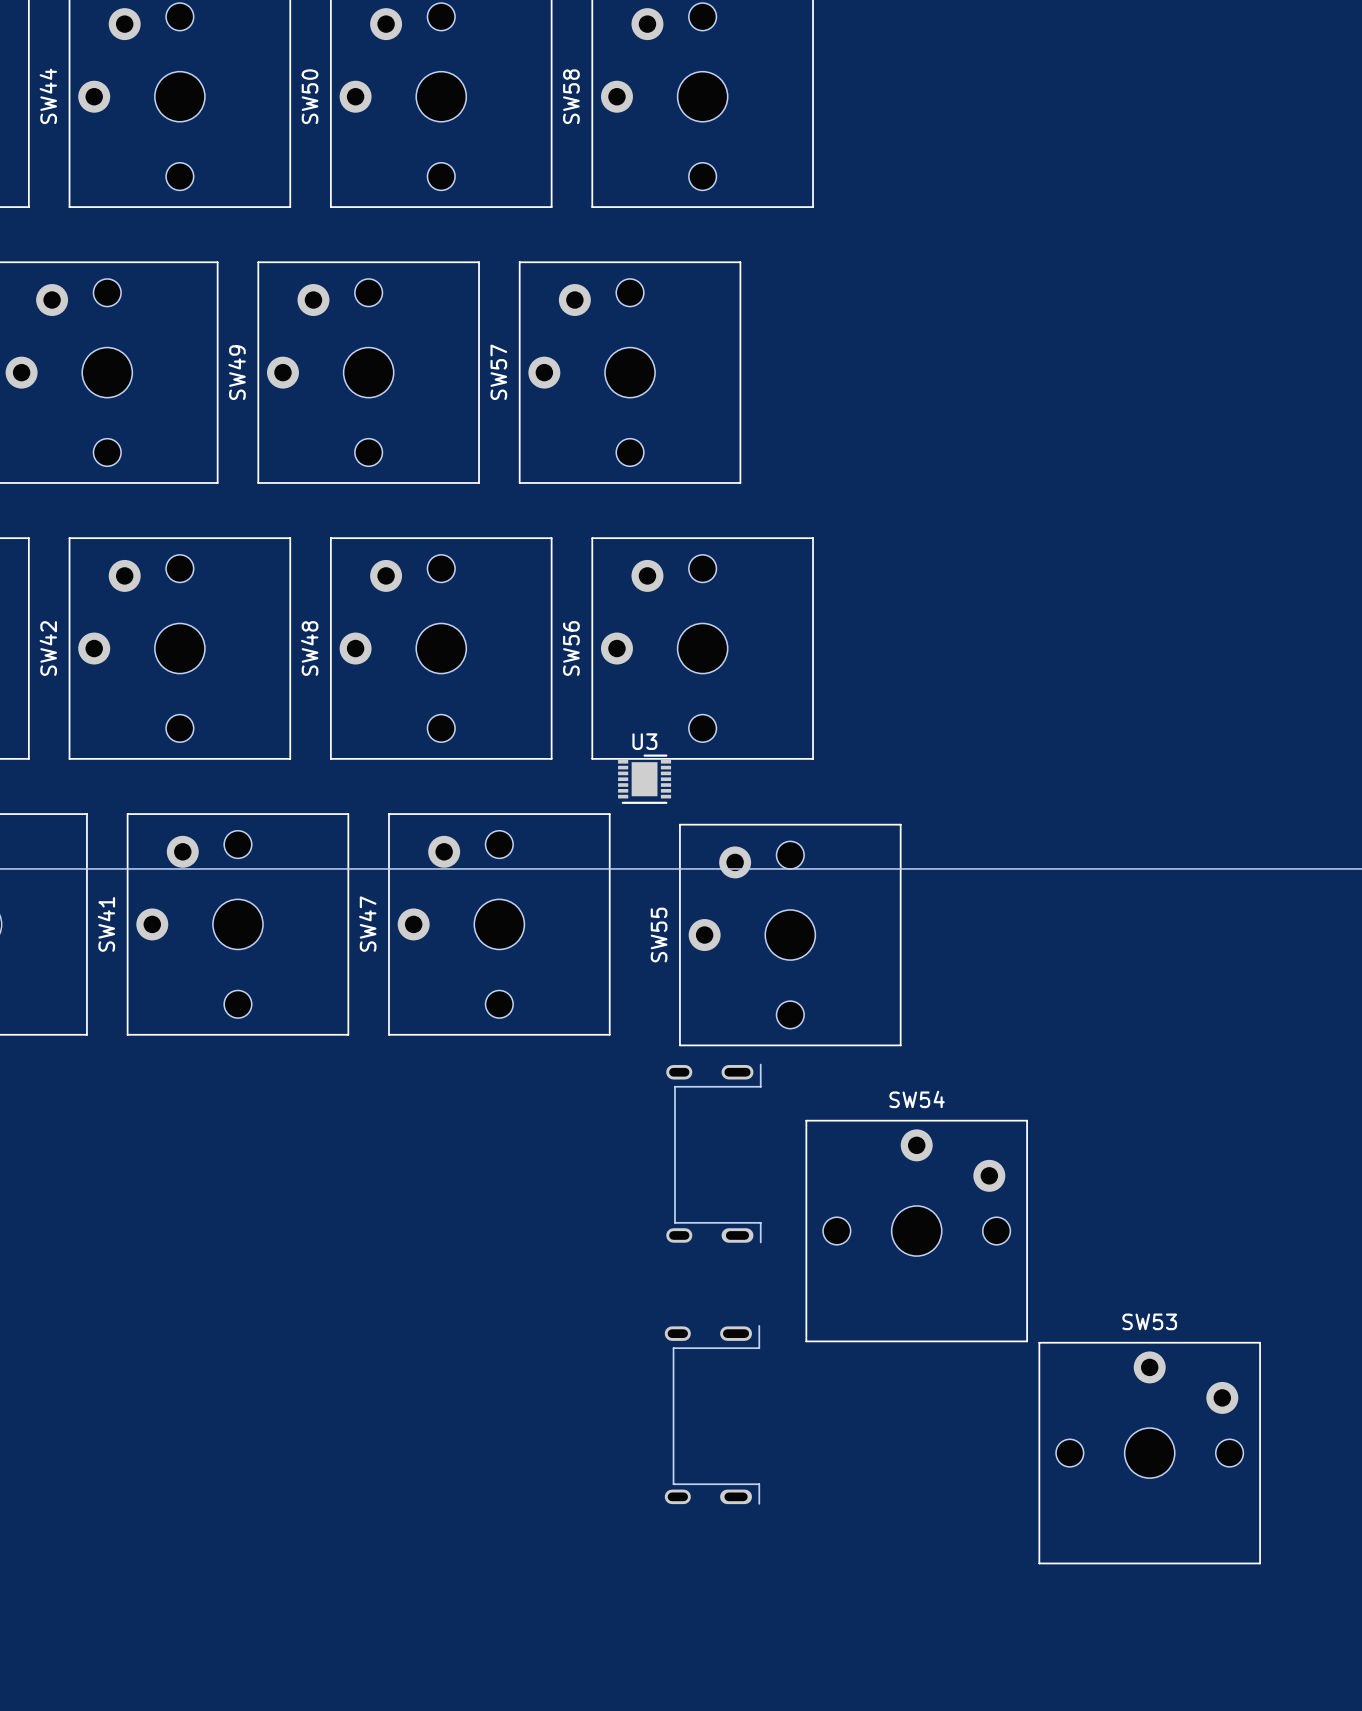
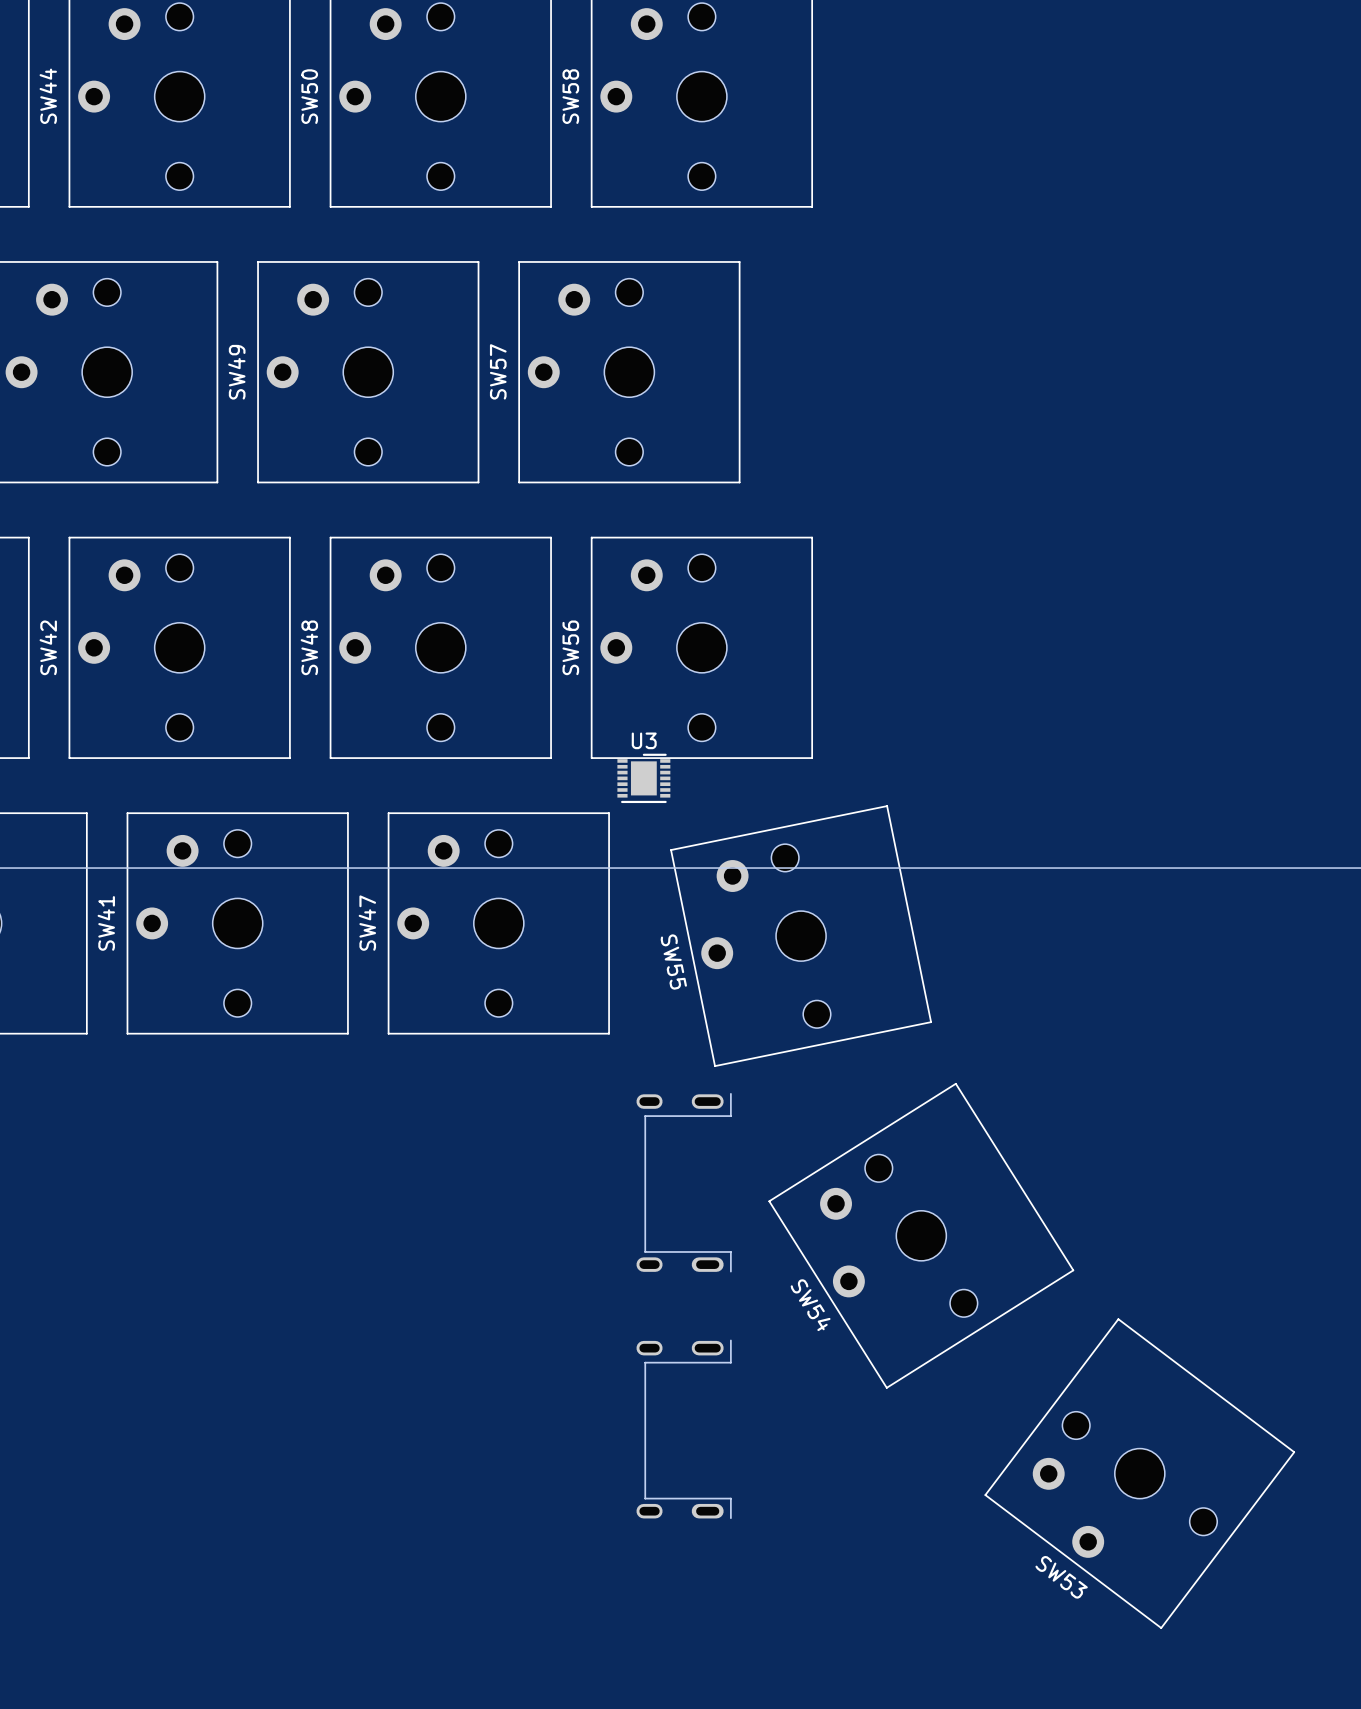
SW55 rotation: 0° (790, 935) -> 11.5° counterclockwise (801, 936)
part position: (713, 1153) -> (684, 1182)
SW54 rotation: 0° (916, 1231) -> 122.2° counterclockwise (921, 1235)
part position: (712, 1414) -> (684, 1429)
SW53 rotation: 0° (1149, 1453) -> 142.9° counterclockwise (1139, 1473)

